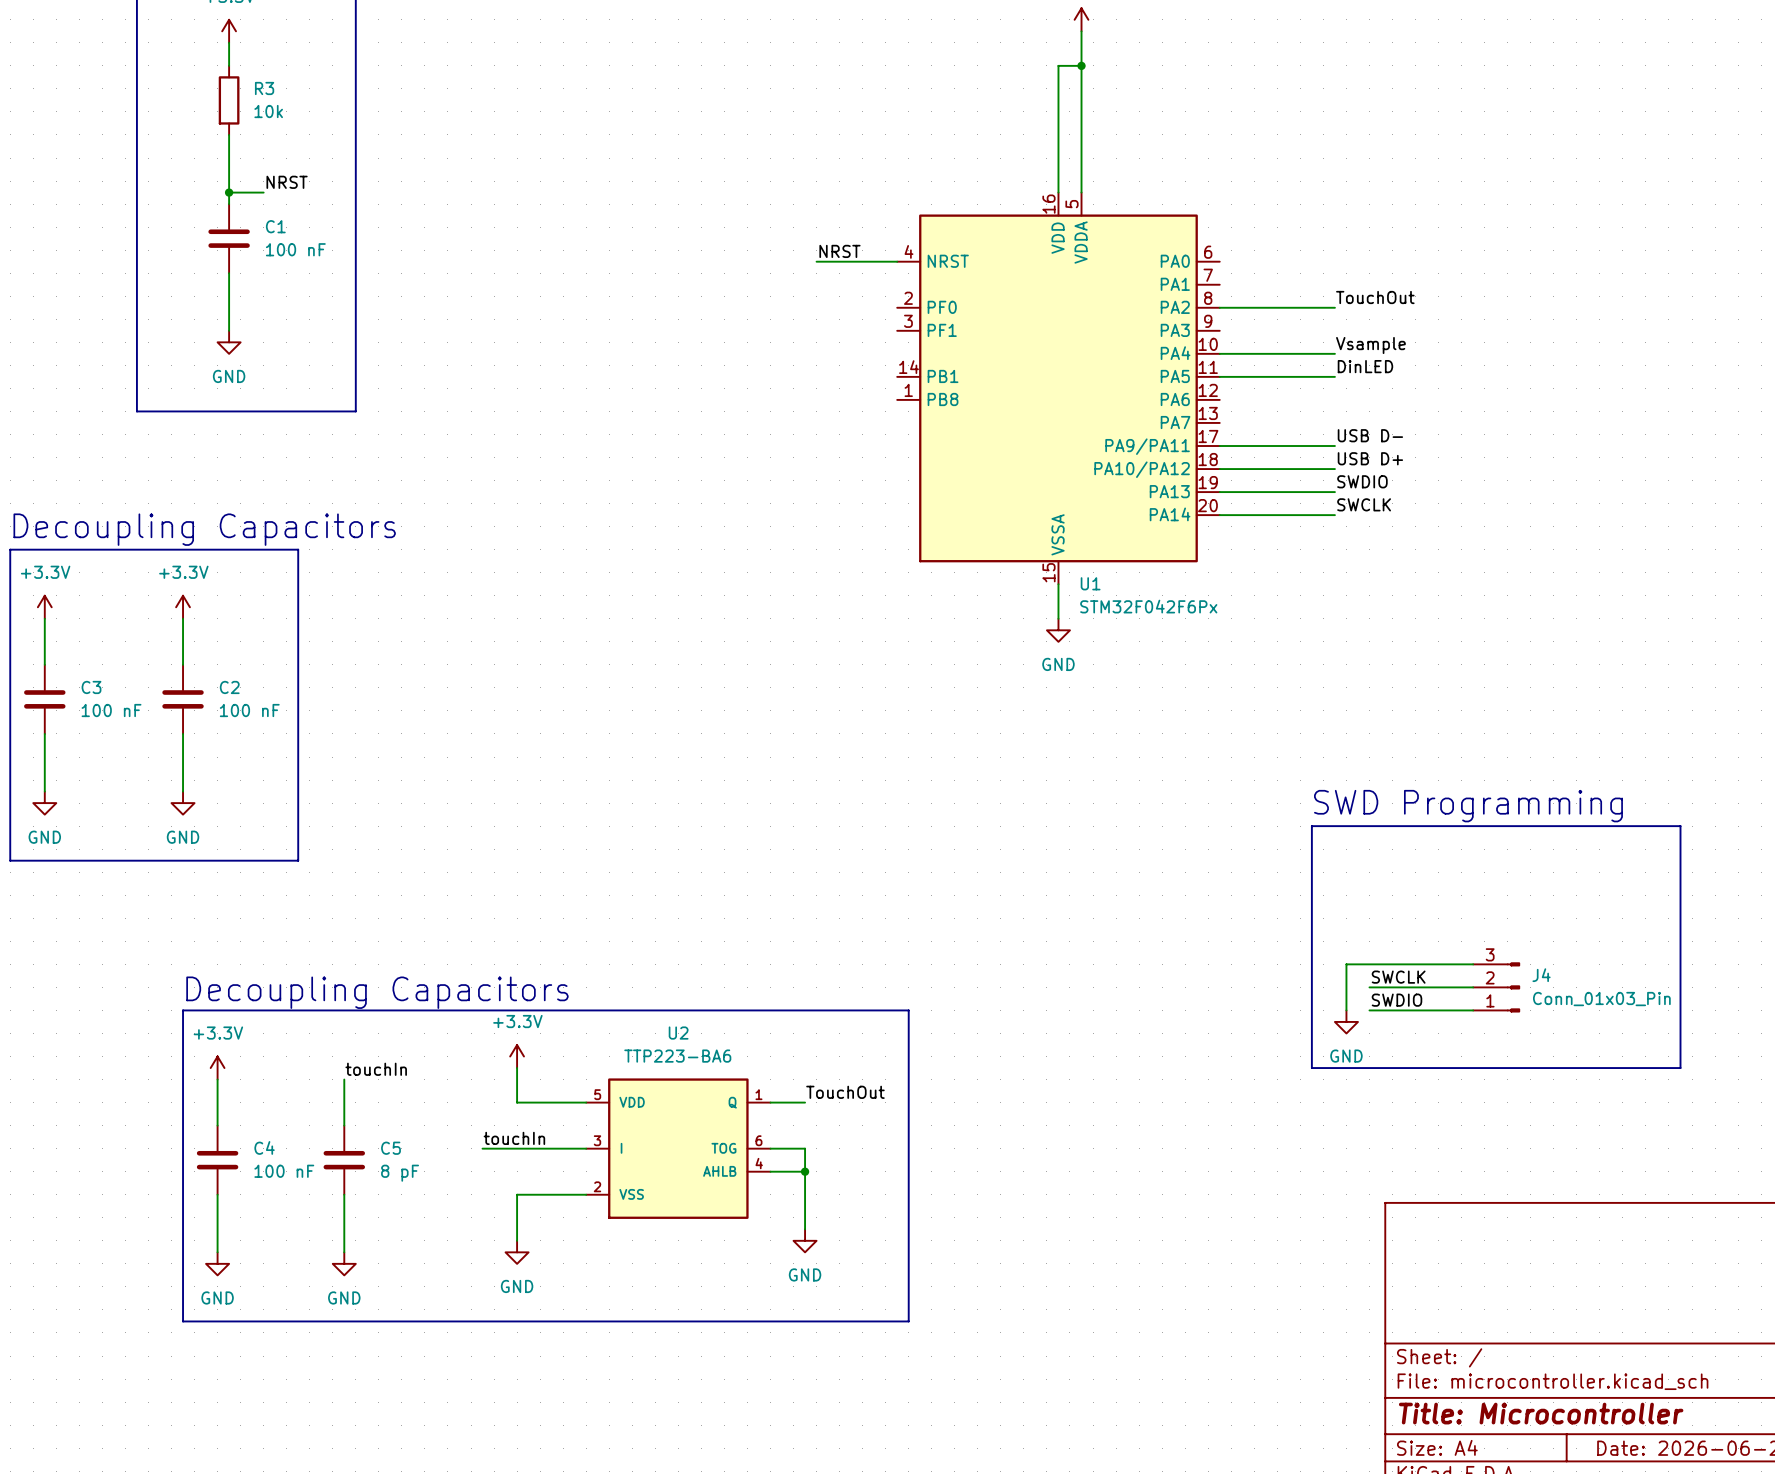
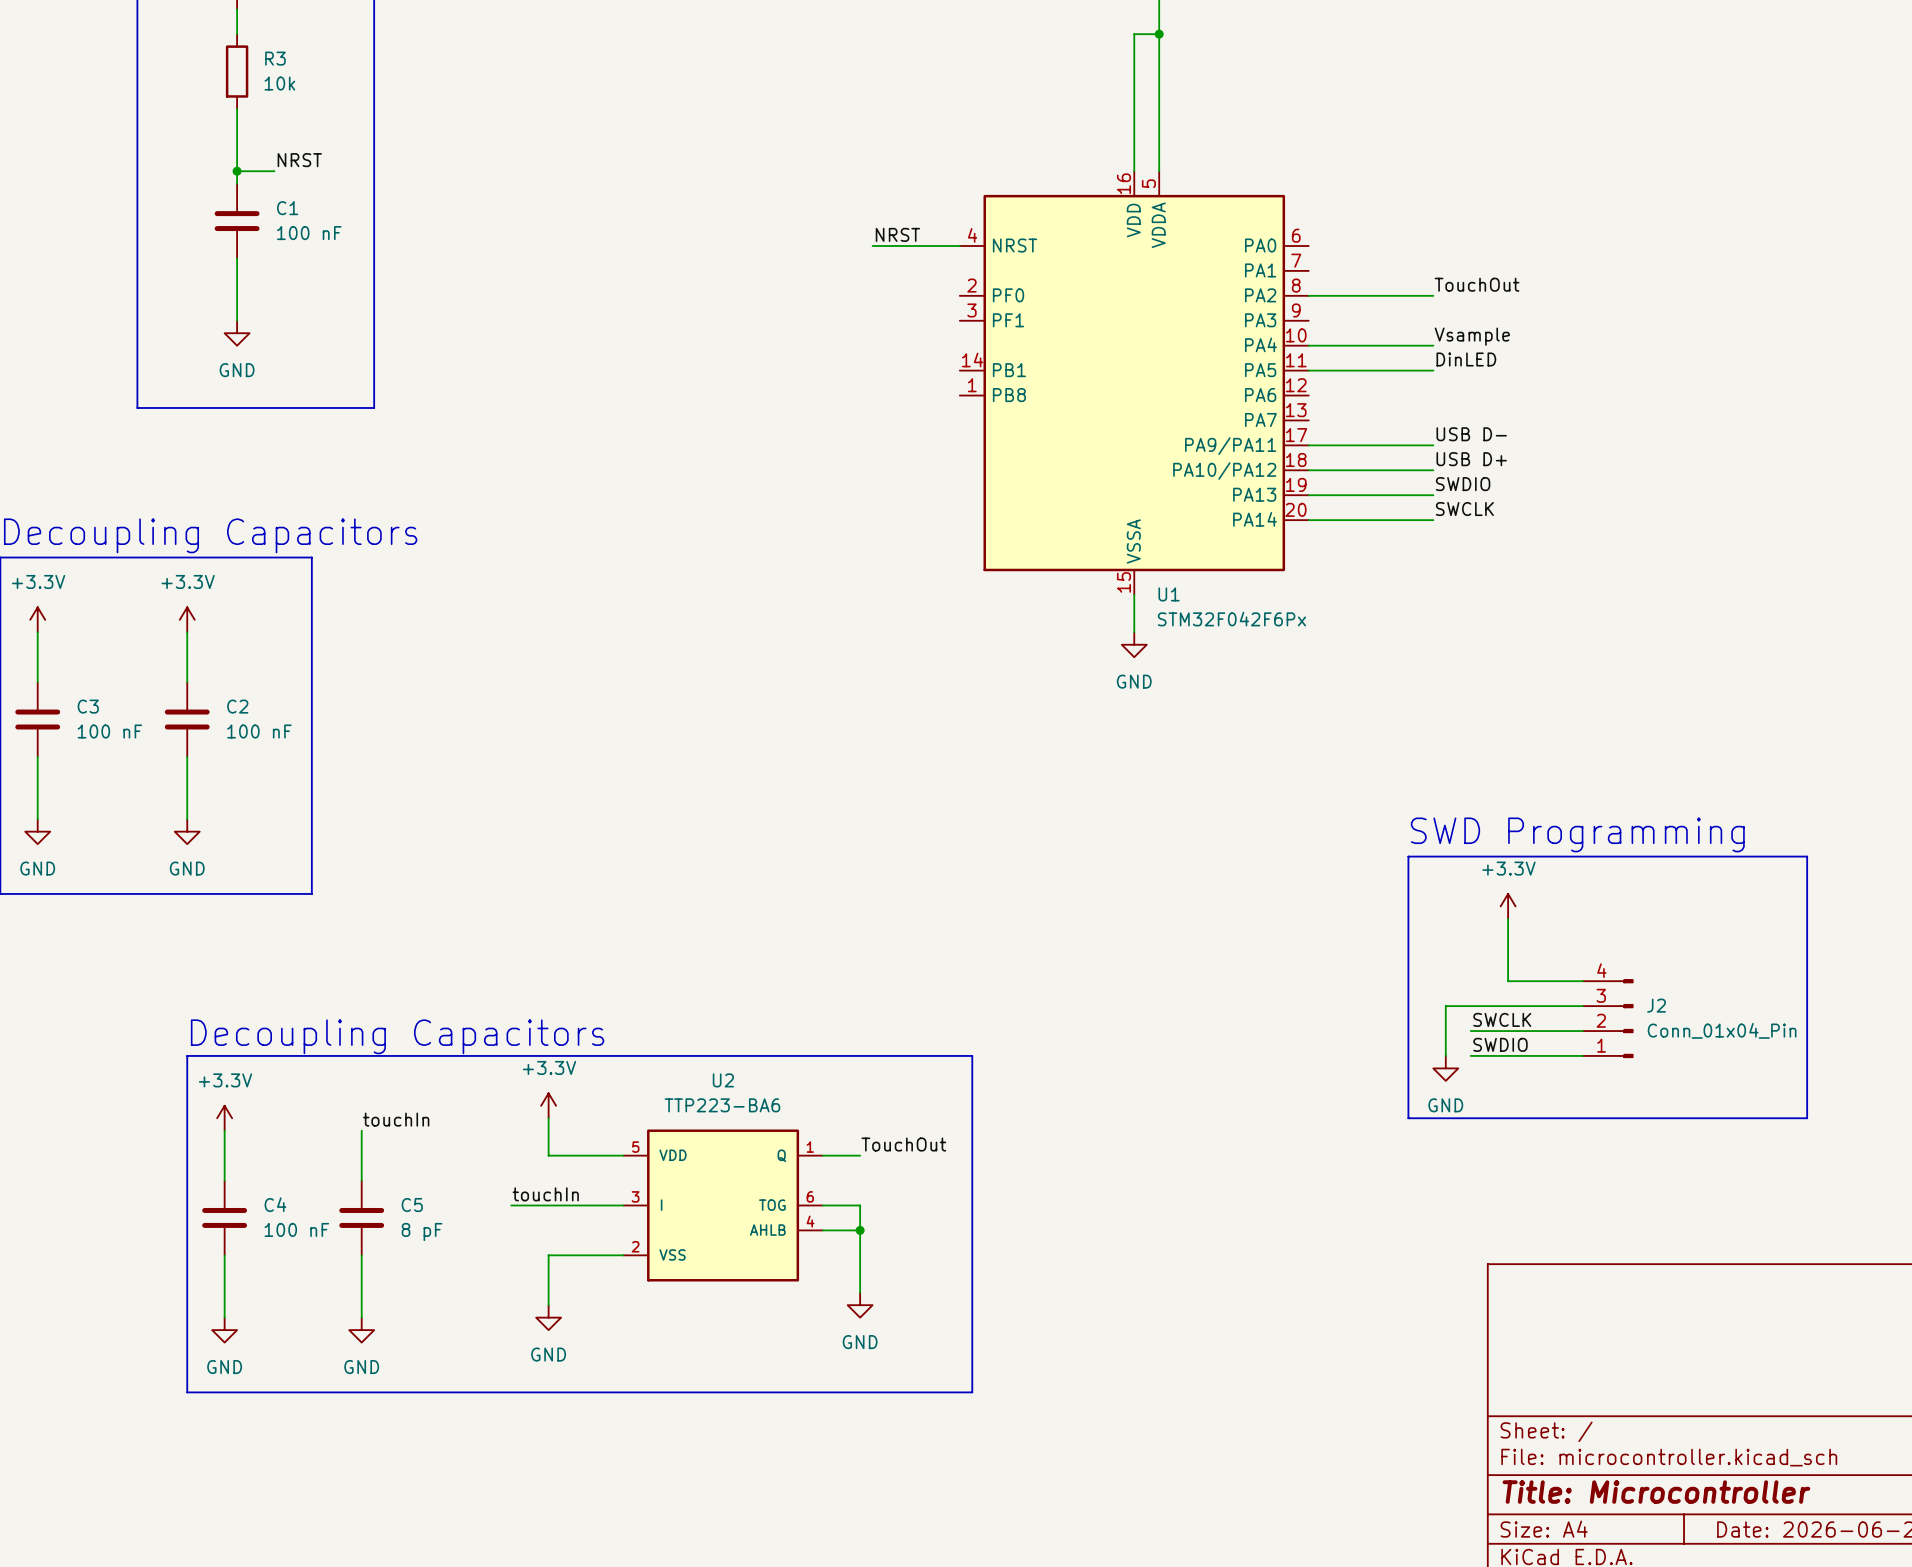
power symbol: none -> +3.3V (1508, 906)
wire: none -> (1508, 918) (1508, 981) (1582, 981)
J2: none -> Conn_01x04_Pin (1608, 1018)
J4: Conn_01x03_Pin (1496, 987) -> none

